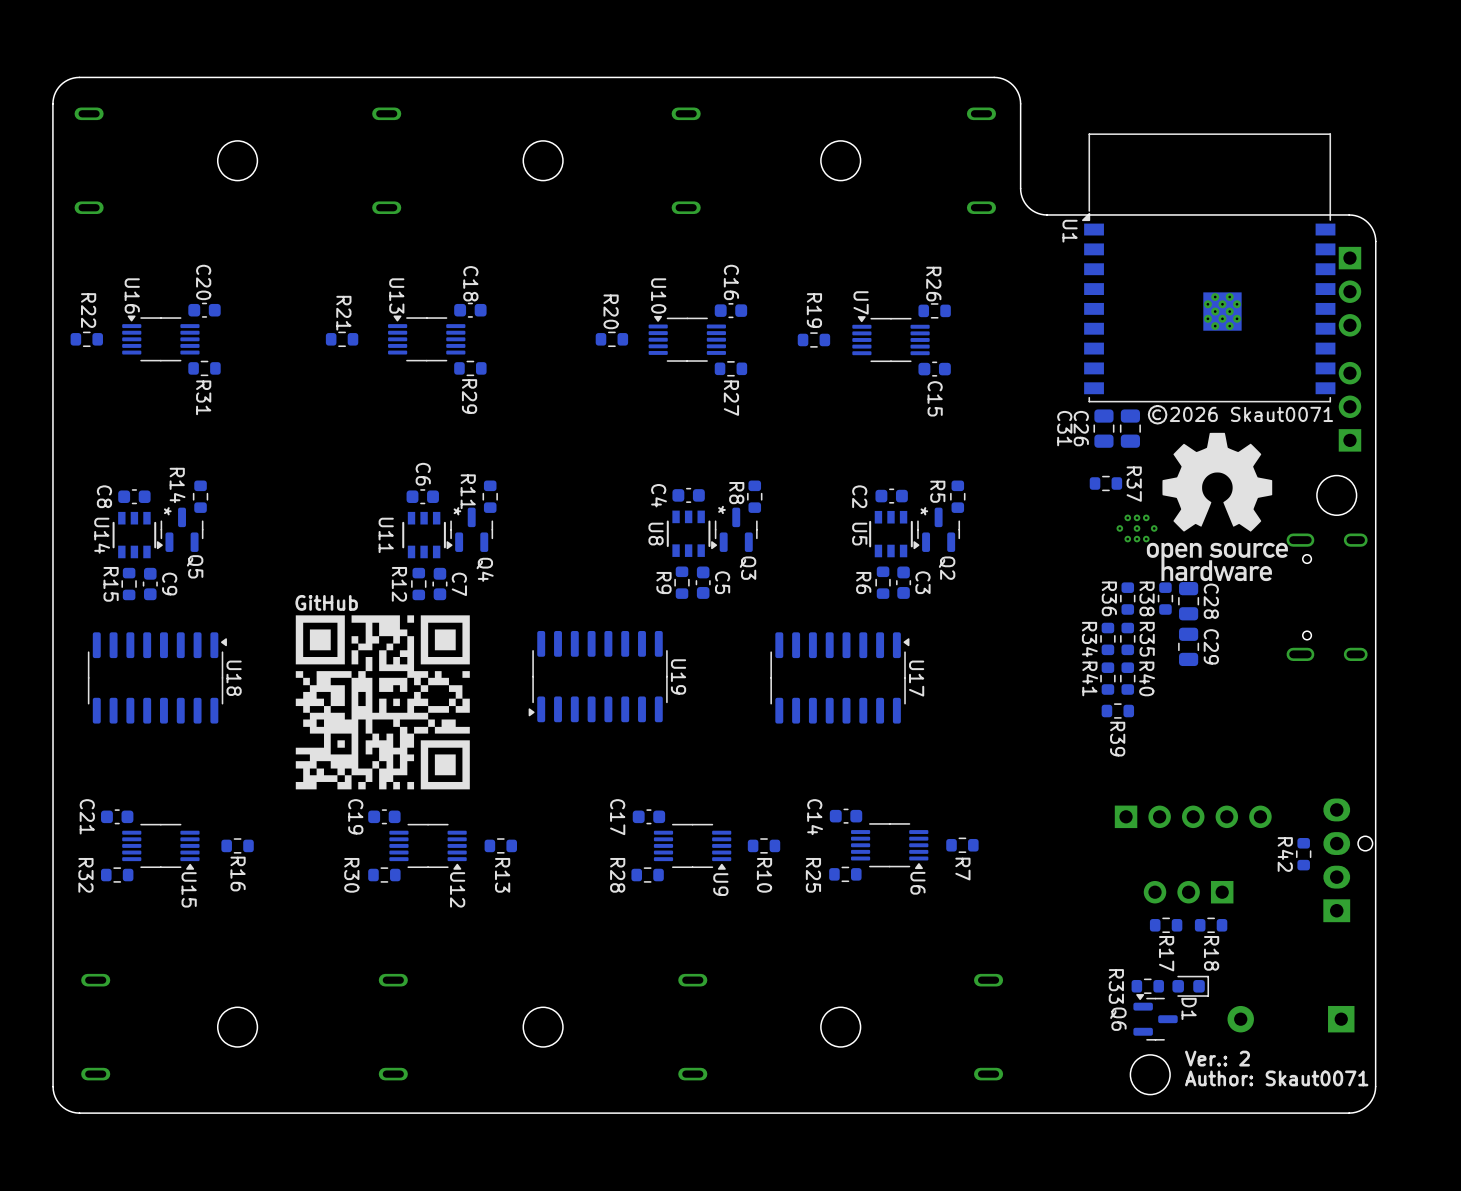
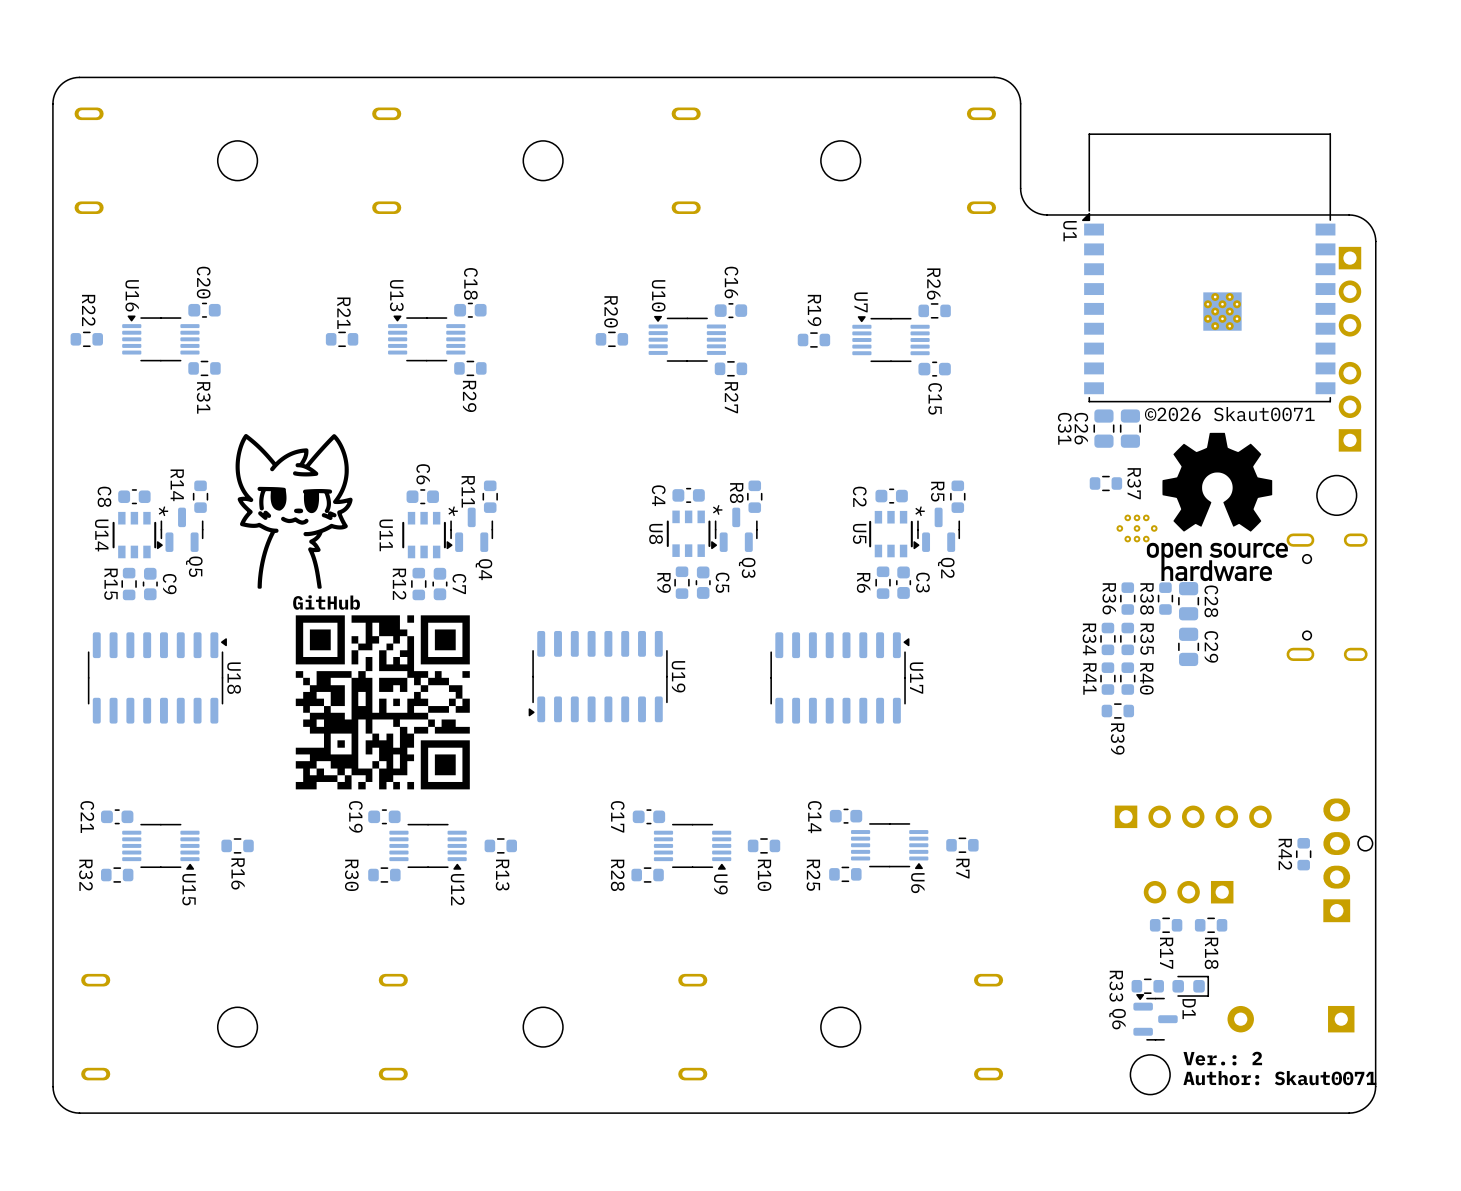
drawing: none -> [235, 434, 353, 589]

